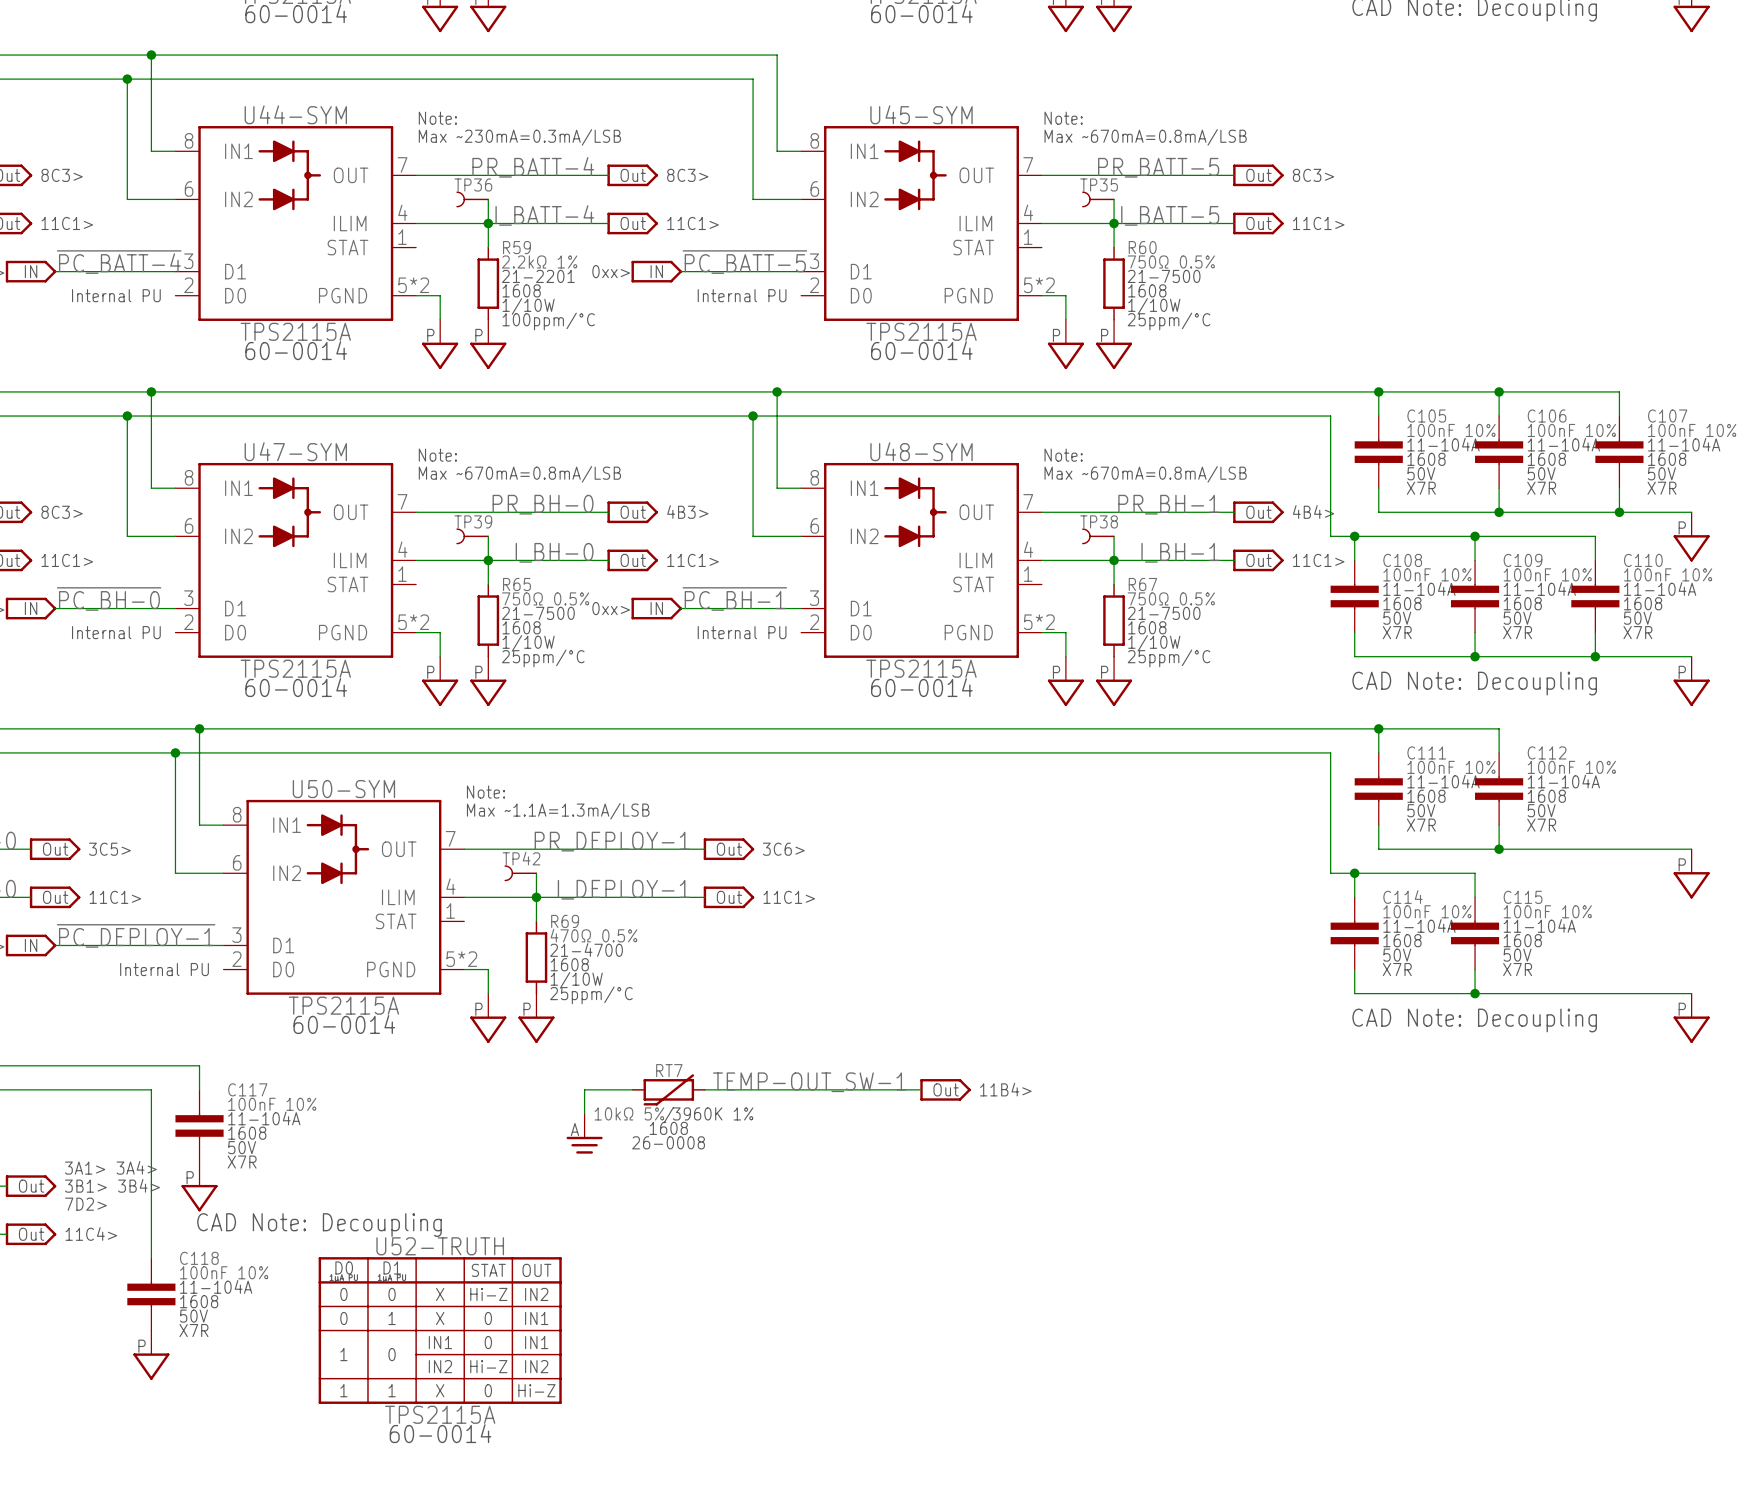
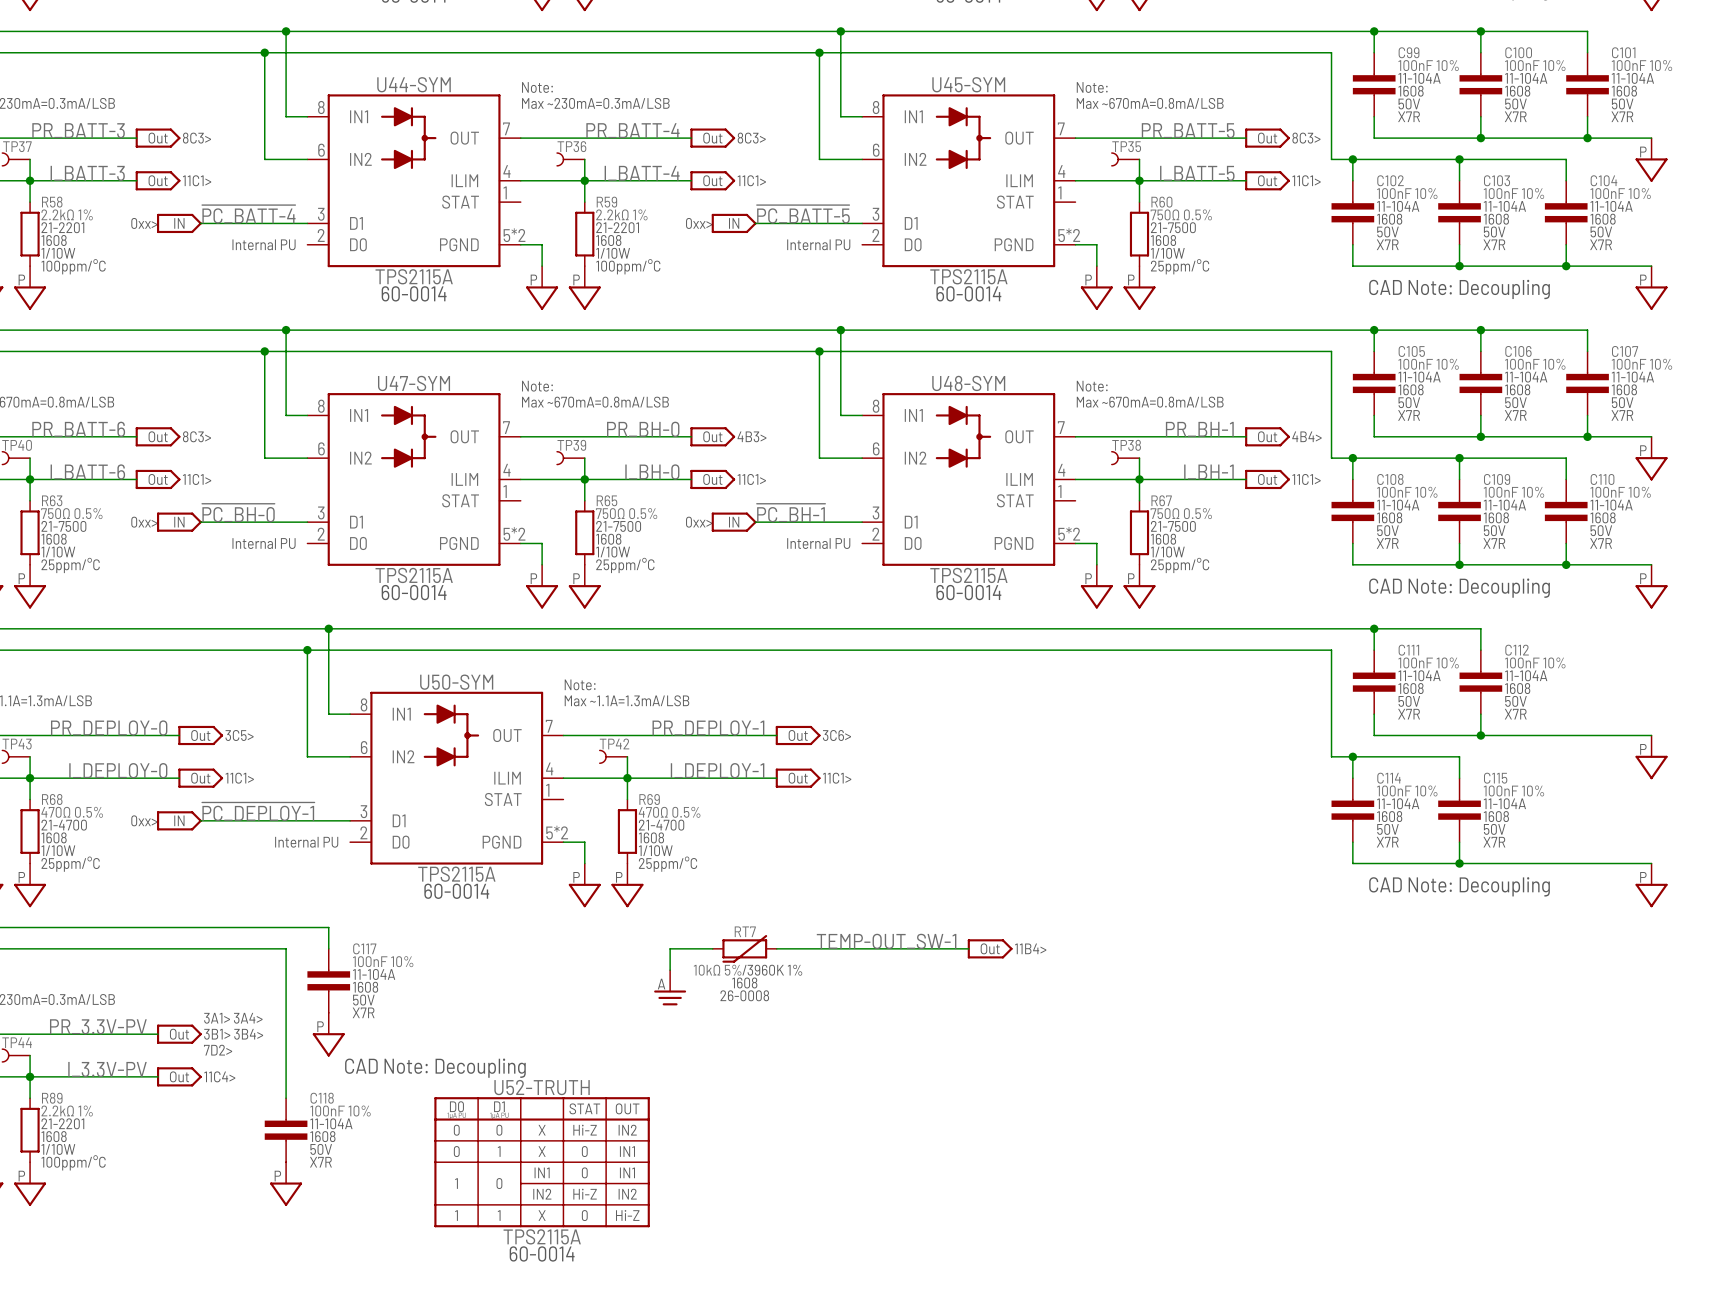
wire: none -> (840, 31) (1587, 31) (1587, 52)
junction: none -> (840, 31)
wire: none -> (1374, 31) (1374, 52)
junction: none -> (1374, 31)
wire: none -> (1480, 31) (1480, 52)
junction: none -> (1480, 31)
wire: none -> (819, 52) (1331, 52) (1331, 159) (1566, 159) (1566, 180)
junction: none -> (819, 52)
C99: none -> 100nF 10% (1374, 84)
C100: none -> 100nF 10% (1480, 84)
C101: none -> 100nF 10% (1587, 84)
wire: none -> (1374, 116) (1374, 138) (1651, 138)
wire: none -> (1480, 116) (1480, 138)
wire: none -> (1587, 116) (1587, 138)
junction: none -> (1480, 138)
junction: none -> (1587, 138)
wire: none -> (1352, 159) (1352, 180)
junction: none -> (1352, 159)
wire: none -> (1459, 159) (1459, 180)
junction: none -> (1459, 159)
power symbol: none -> (1651, 159)
C102: none -> 100nF 10% (1352, 212)
C103: none -> 100nF 10% (1459, 212)
C104: none -> 100nF 10% (1566, 212)
wire: none -> (1352, 244) (1352, 266) (1651, 266)
wire: none -> (1459, 244) (1459, 266)
wire: none -> (1566, 244) (1566, 266)
junction: none -> (1459, 266)
junction: none -> (1566, 266)
power symbol: none -> (1651, 287)
text: none -> CAD Note: Decoupling (1459, 289)

